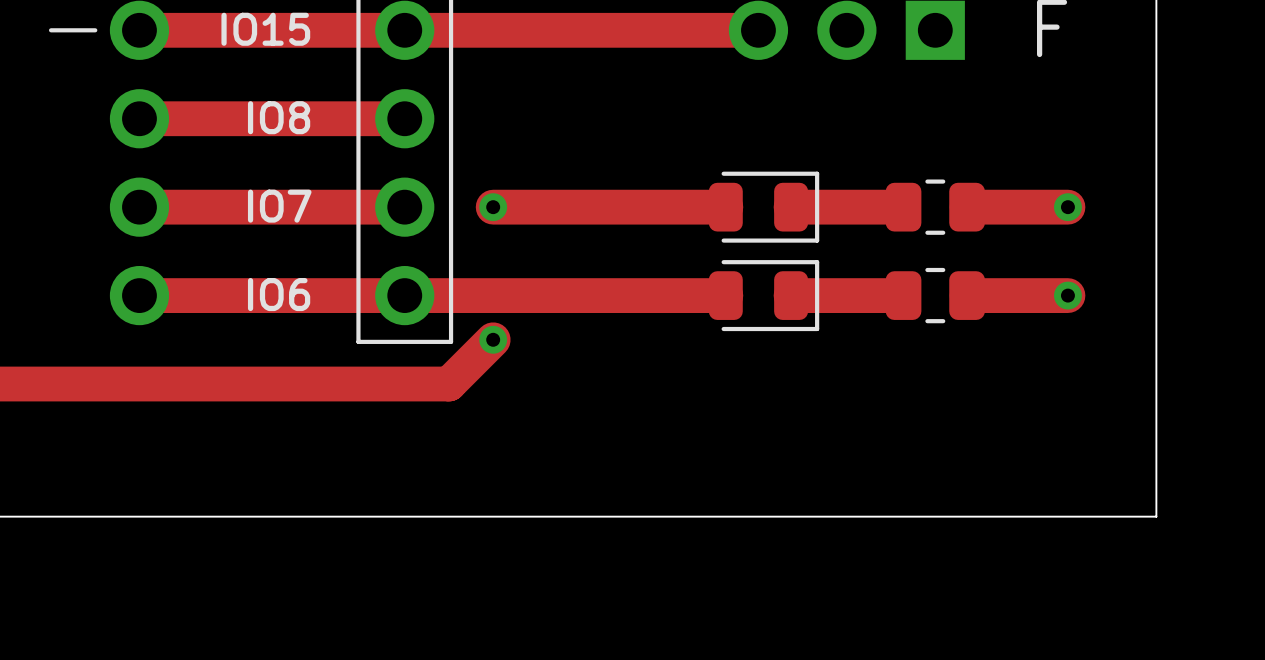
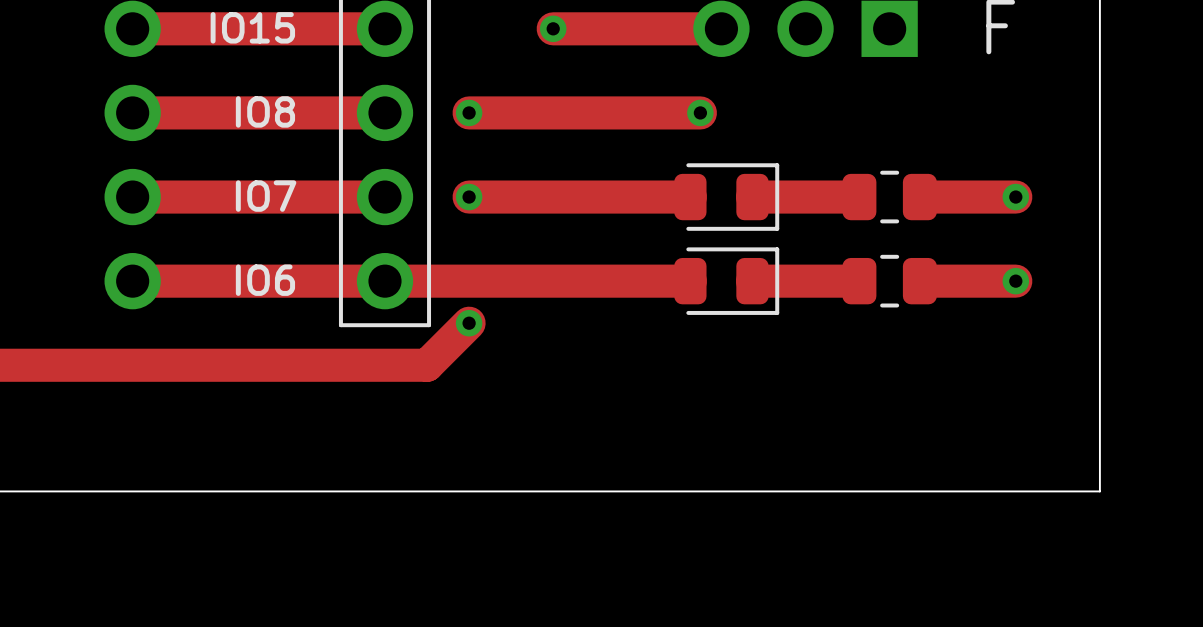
line: (51, 30) (95, 30) -> none
track: (404, 30) (581, 30) -> none
via: none -> (553, 28)
track: none -> (469, 112) (700, 112)
via: none -> (469, 112)
via: none -> (700, 112)

